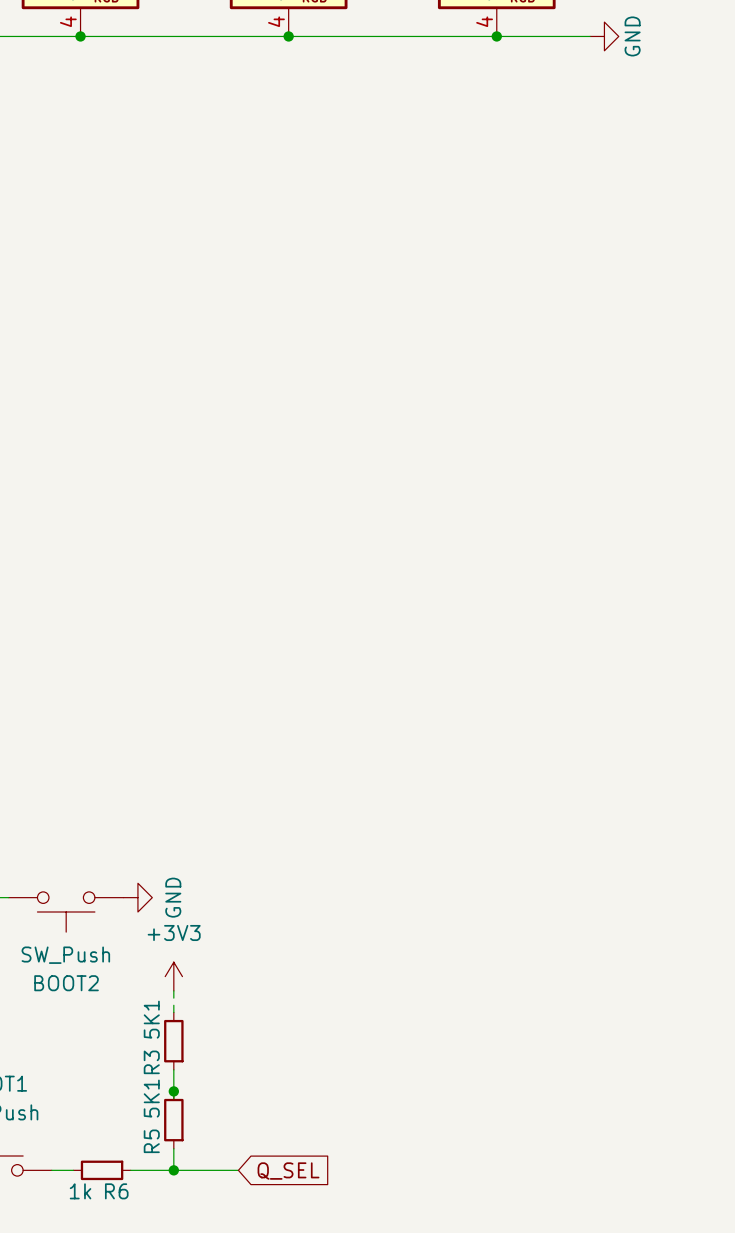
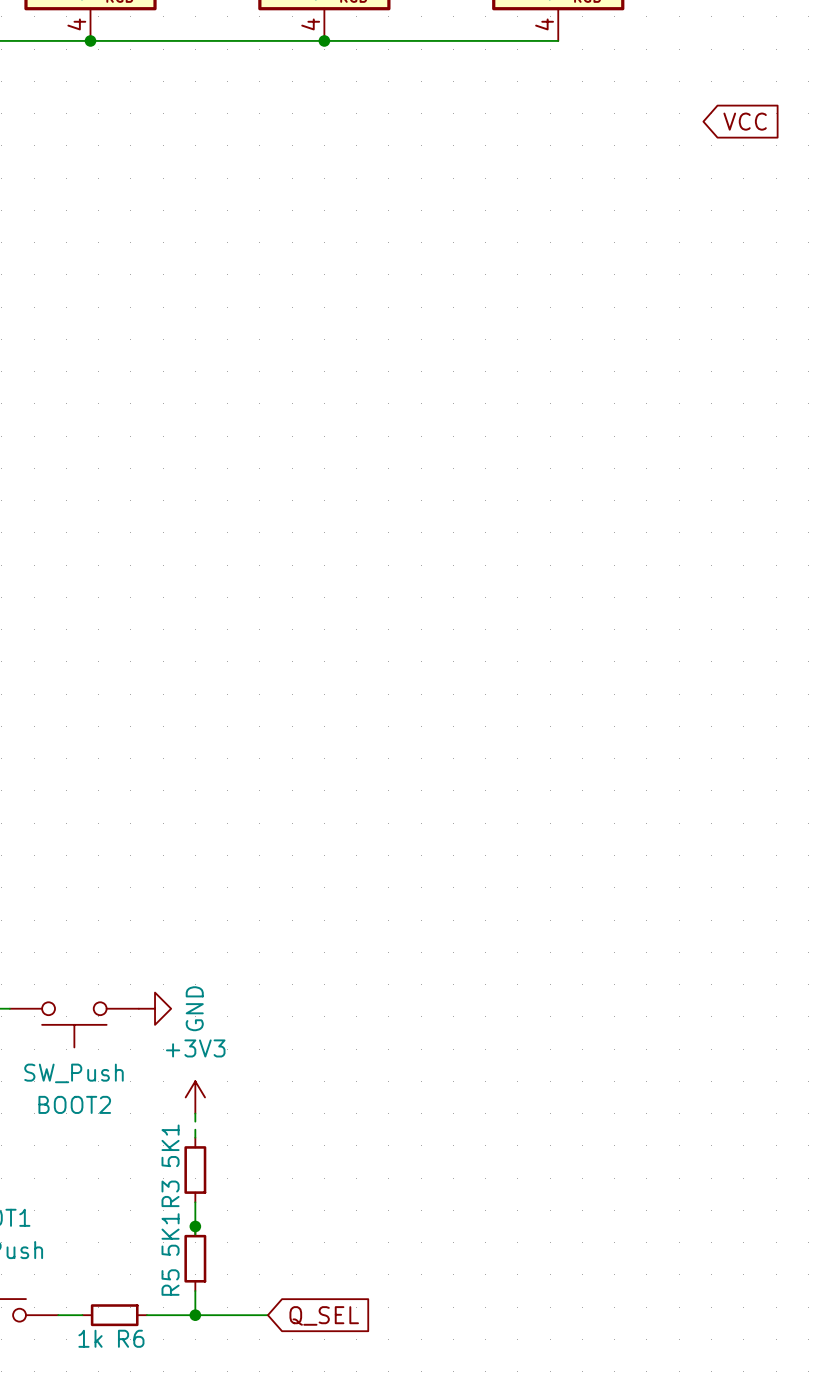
wire: (496, 36) (590, 36) -> none
junction: (496, 36) -> none
power symbol: GND (604, 36) -> none
global label: none -> VCC (745, 121)

